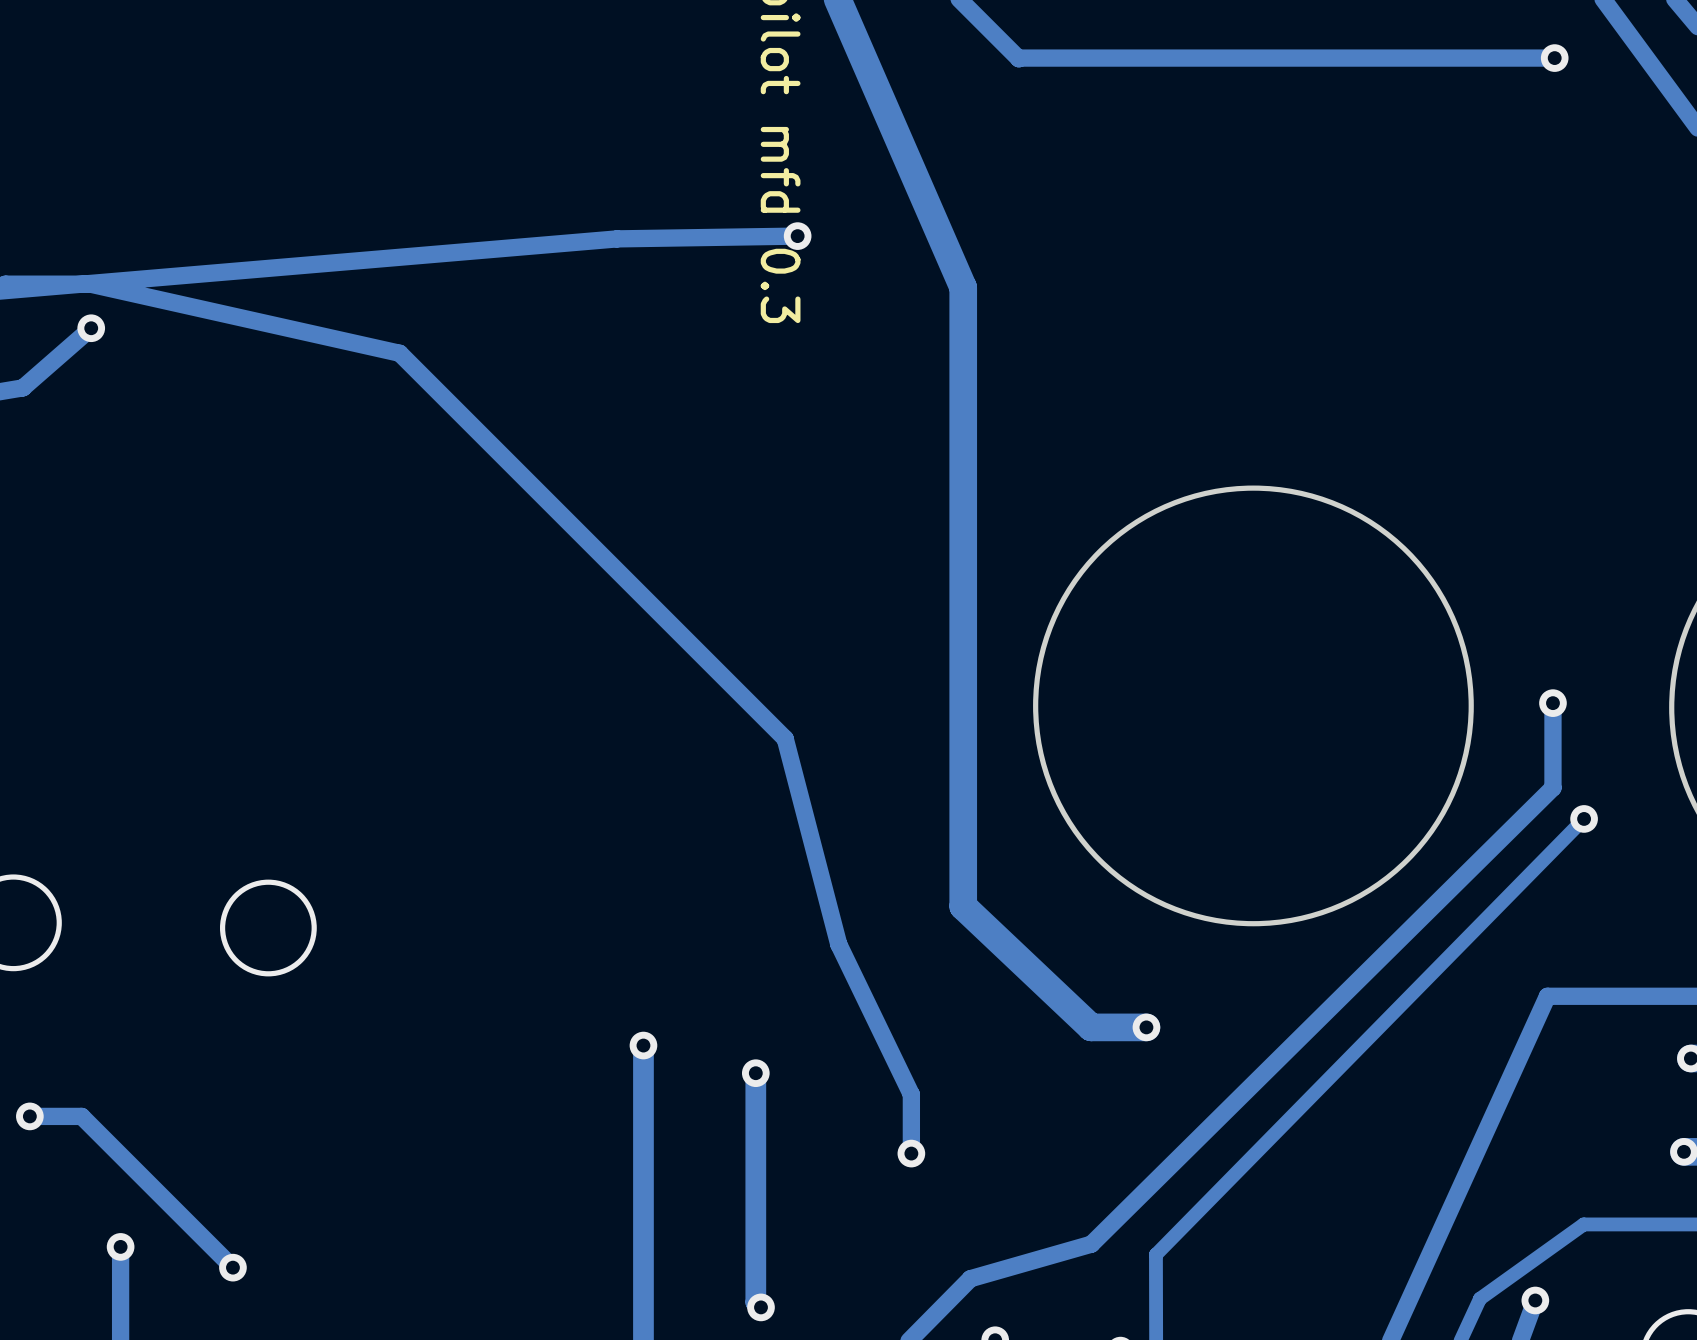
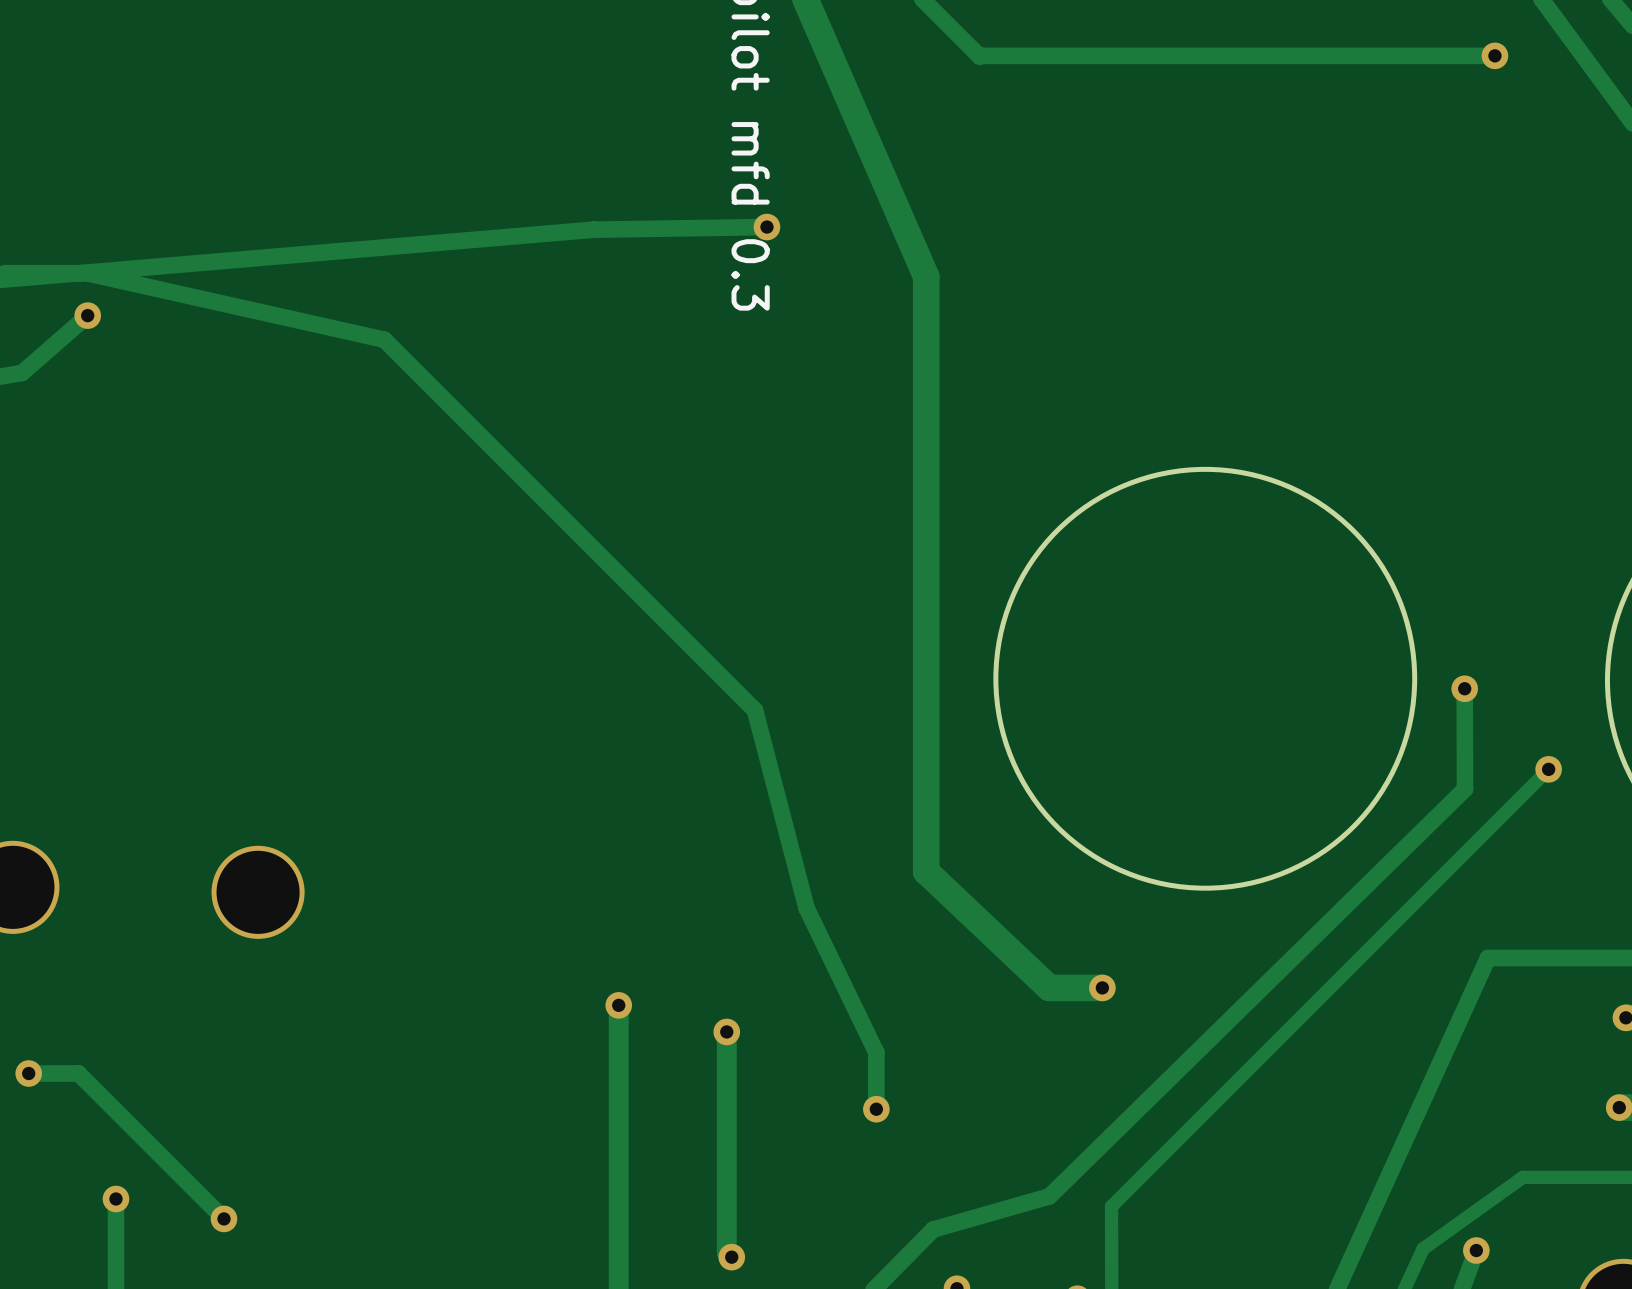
track: (1552, 703) (1552, 787) (1091, 1244) -> (1464, 688) (1465, 789) (1049, 1196)
via position: (1552, 703) -> (1464, 688)
track: (1584, 818) (1155, 1254) -> (1548, 769) (1111, 1206)
via position: (1584, 818) -> (1548, 769)

